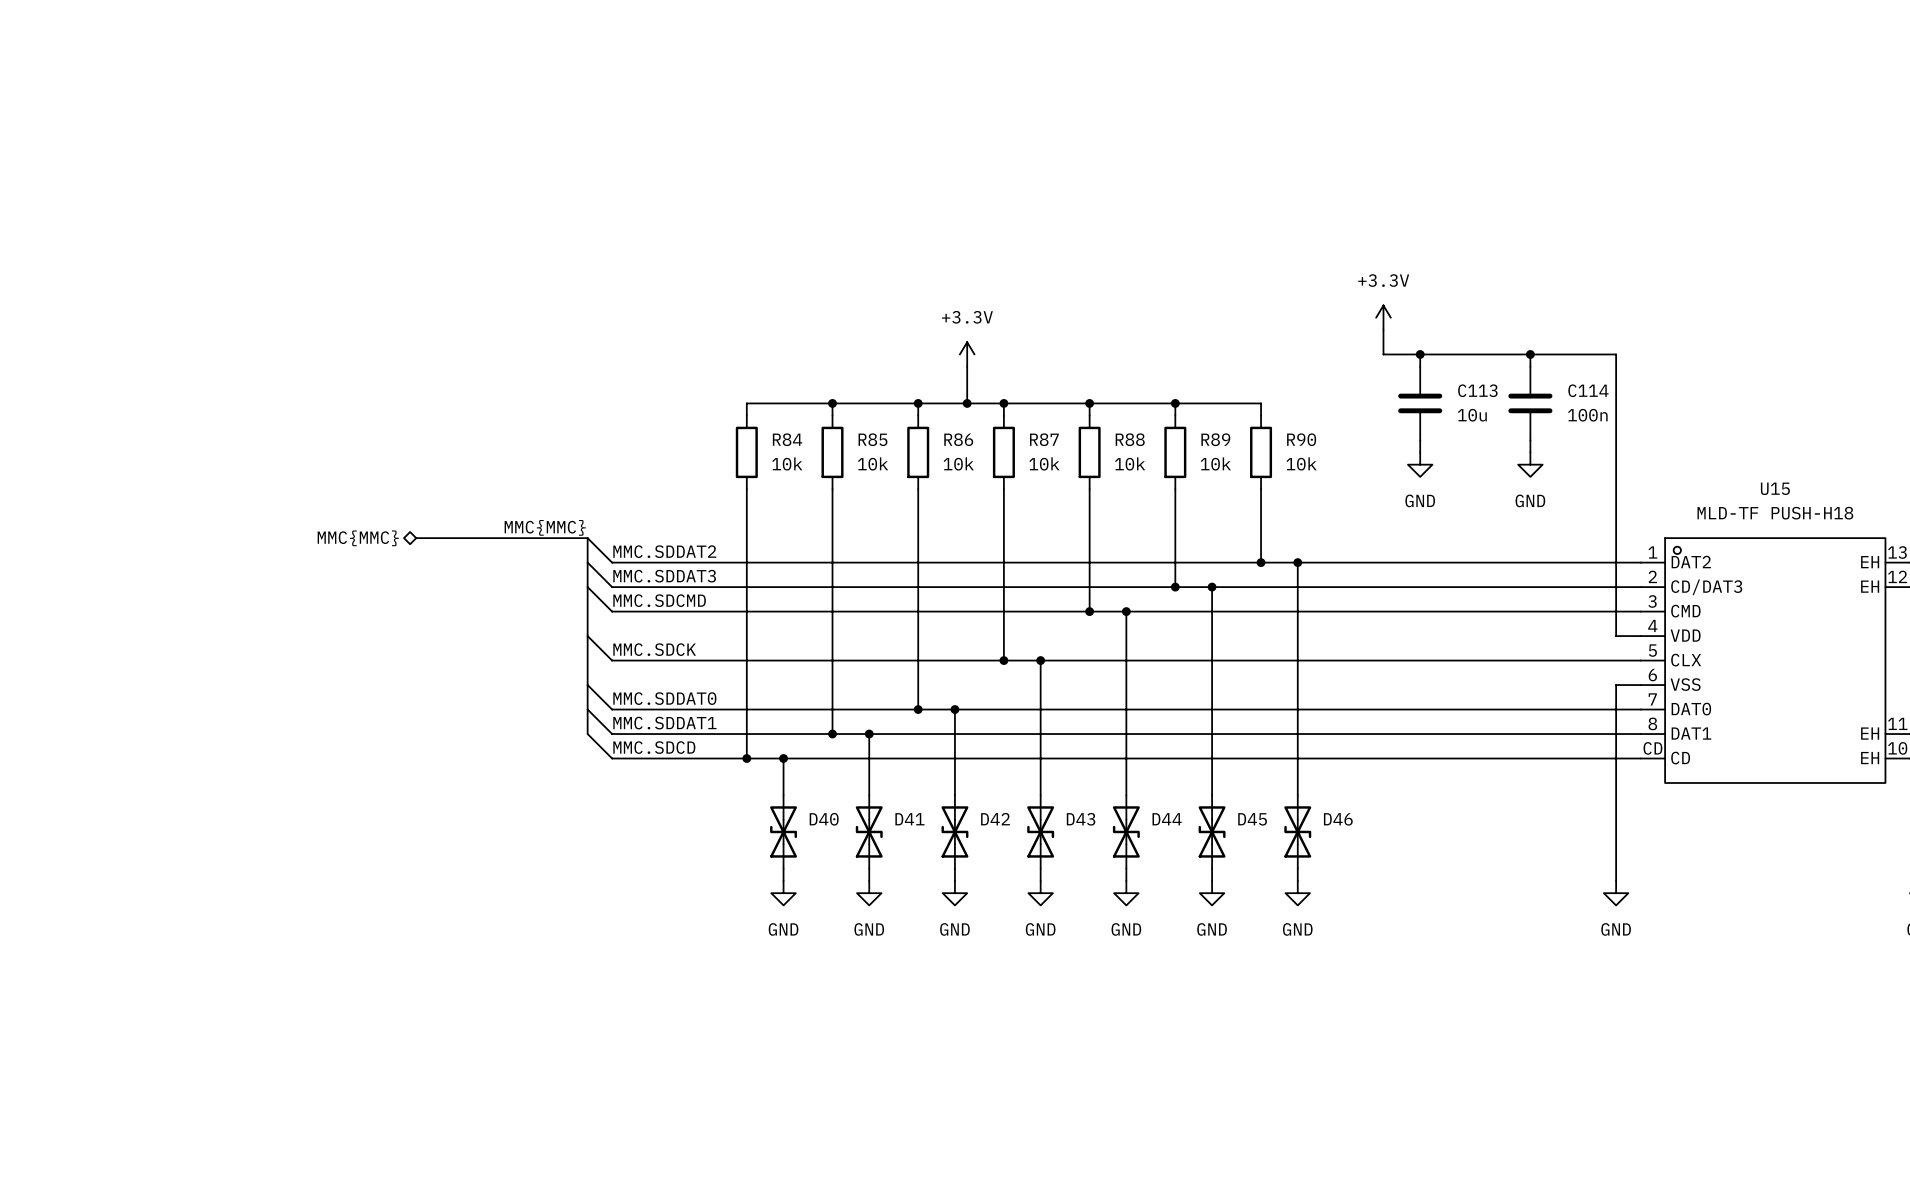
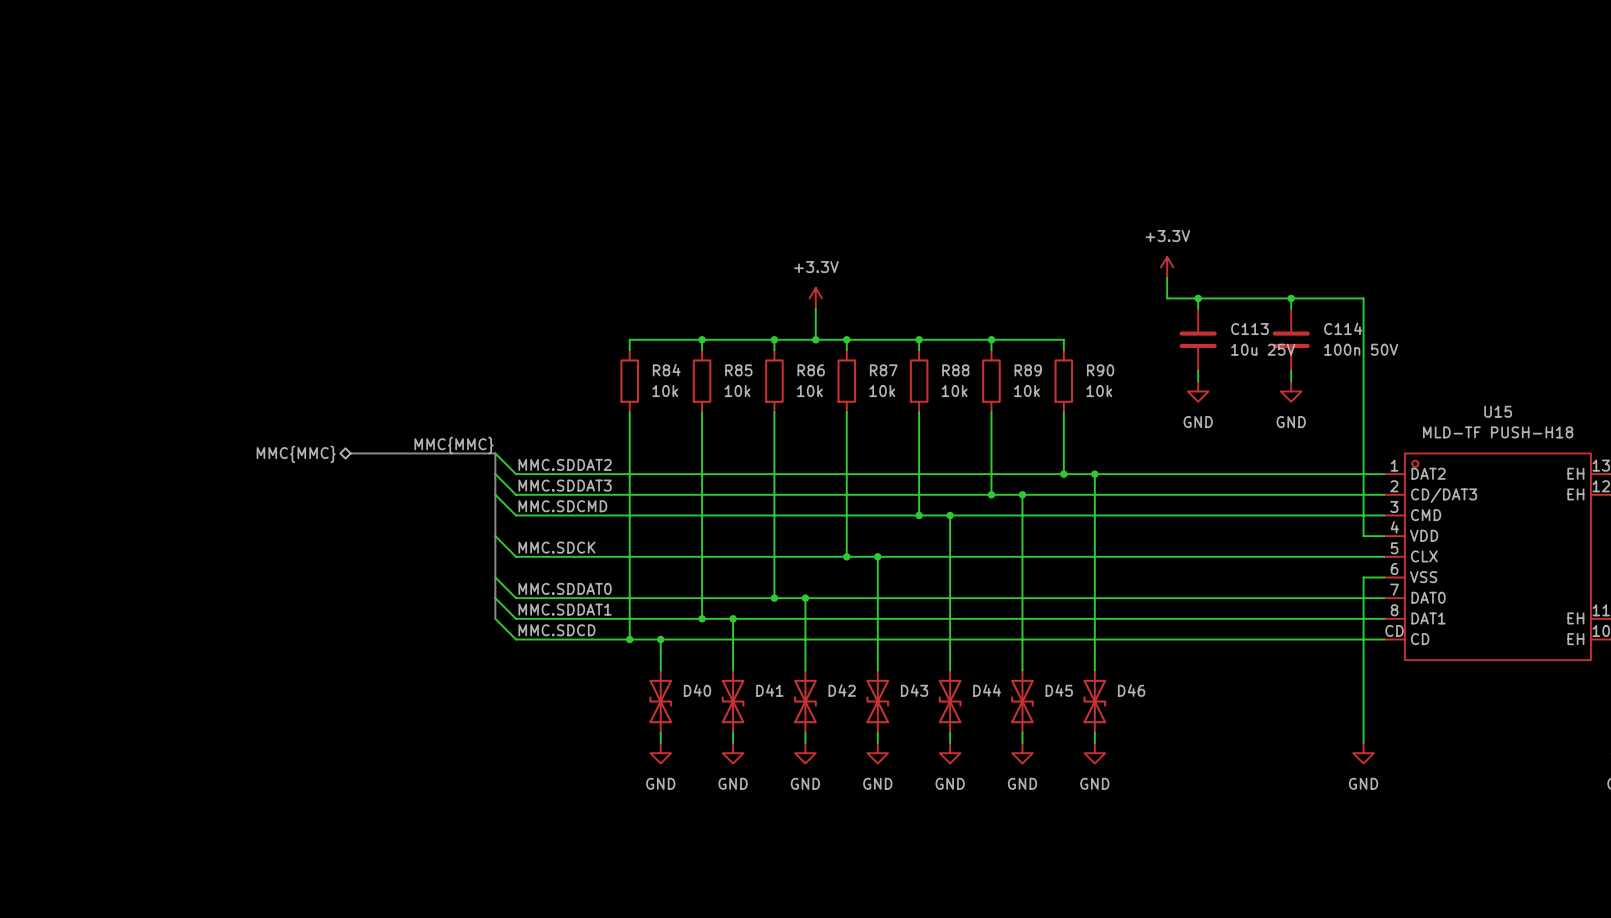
C113 value: 10u (1472, 415) -> 10u 25V (1263, 349)
C114 value: 100n (1587, 415) -> 100n 50V (1361, 349)

